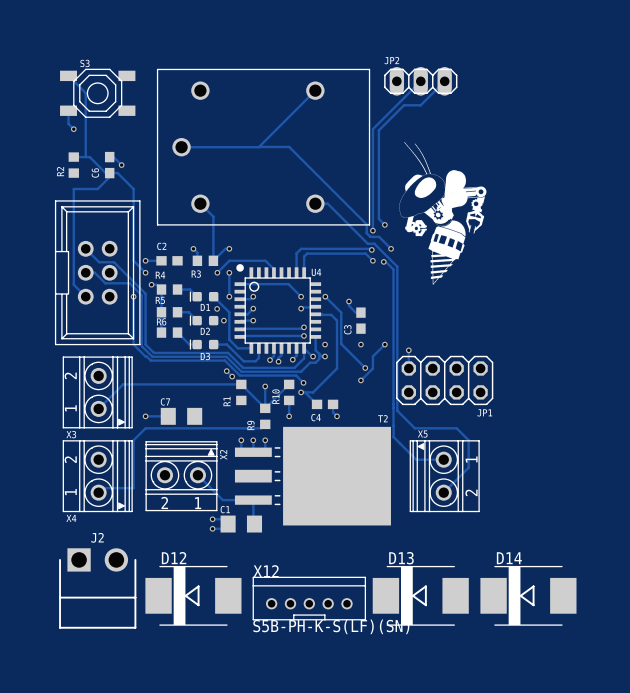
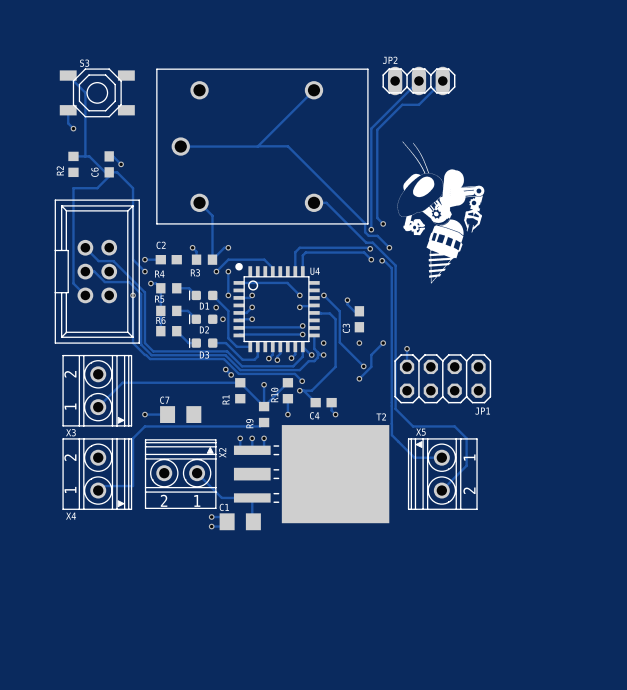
J2: (97, 588) -> none
D12: (193, 595) -> none
D13: (420, 595) -> none
D14: (528, 595) -> none
X12: S5B-PH-K-S(LF)(SN) (309, 598) -> none

